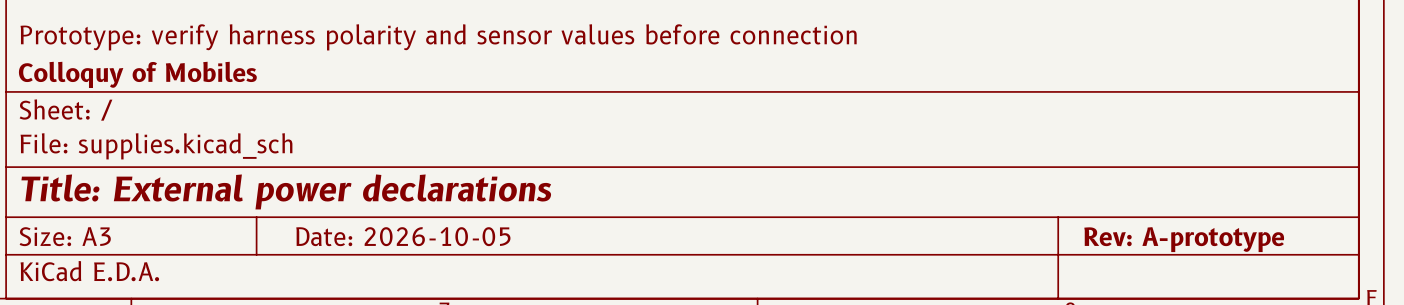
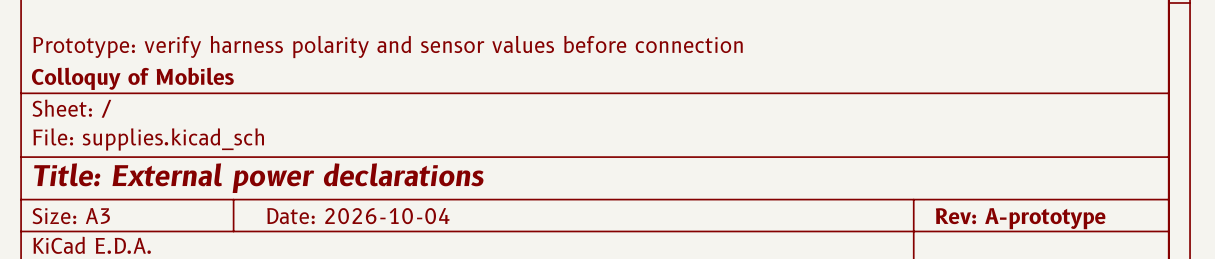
title block: Date: 2026-10-05 (403, 236) -> Date: 2026-10-04 (358, 216)

